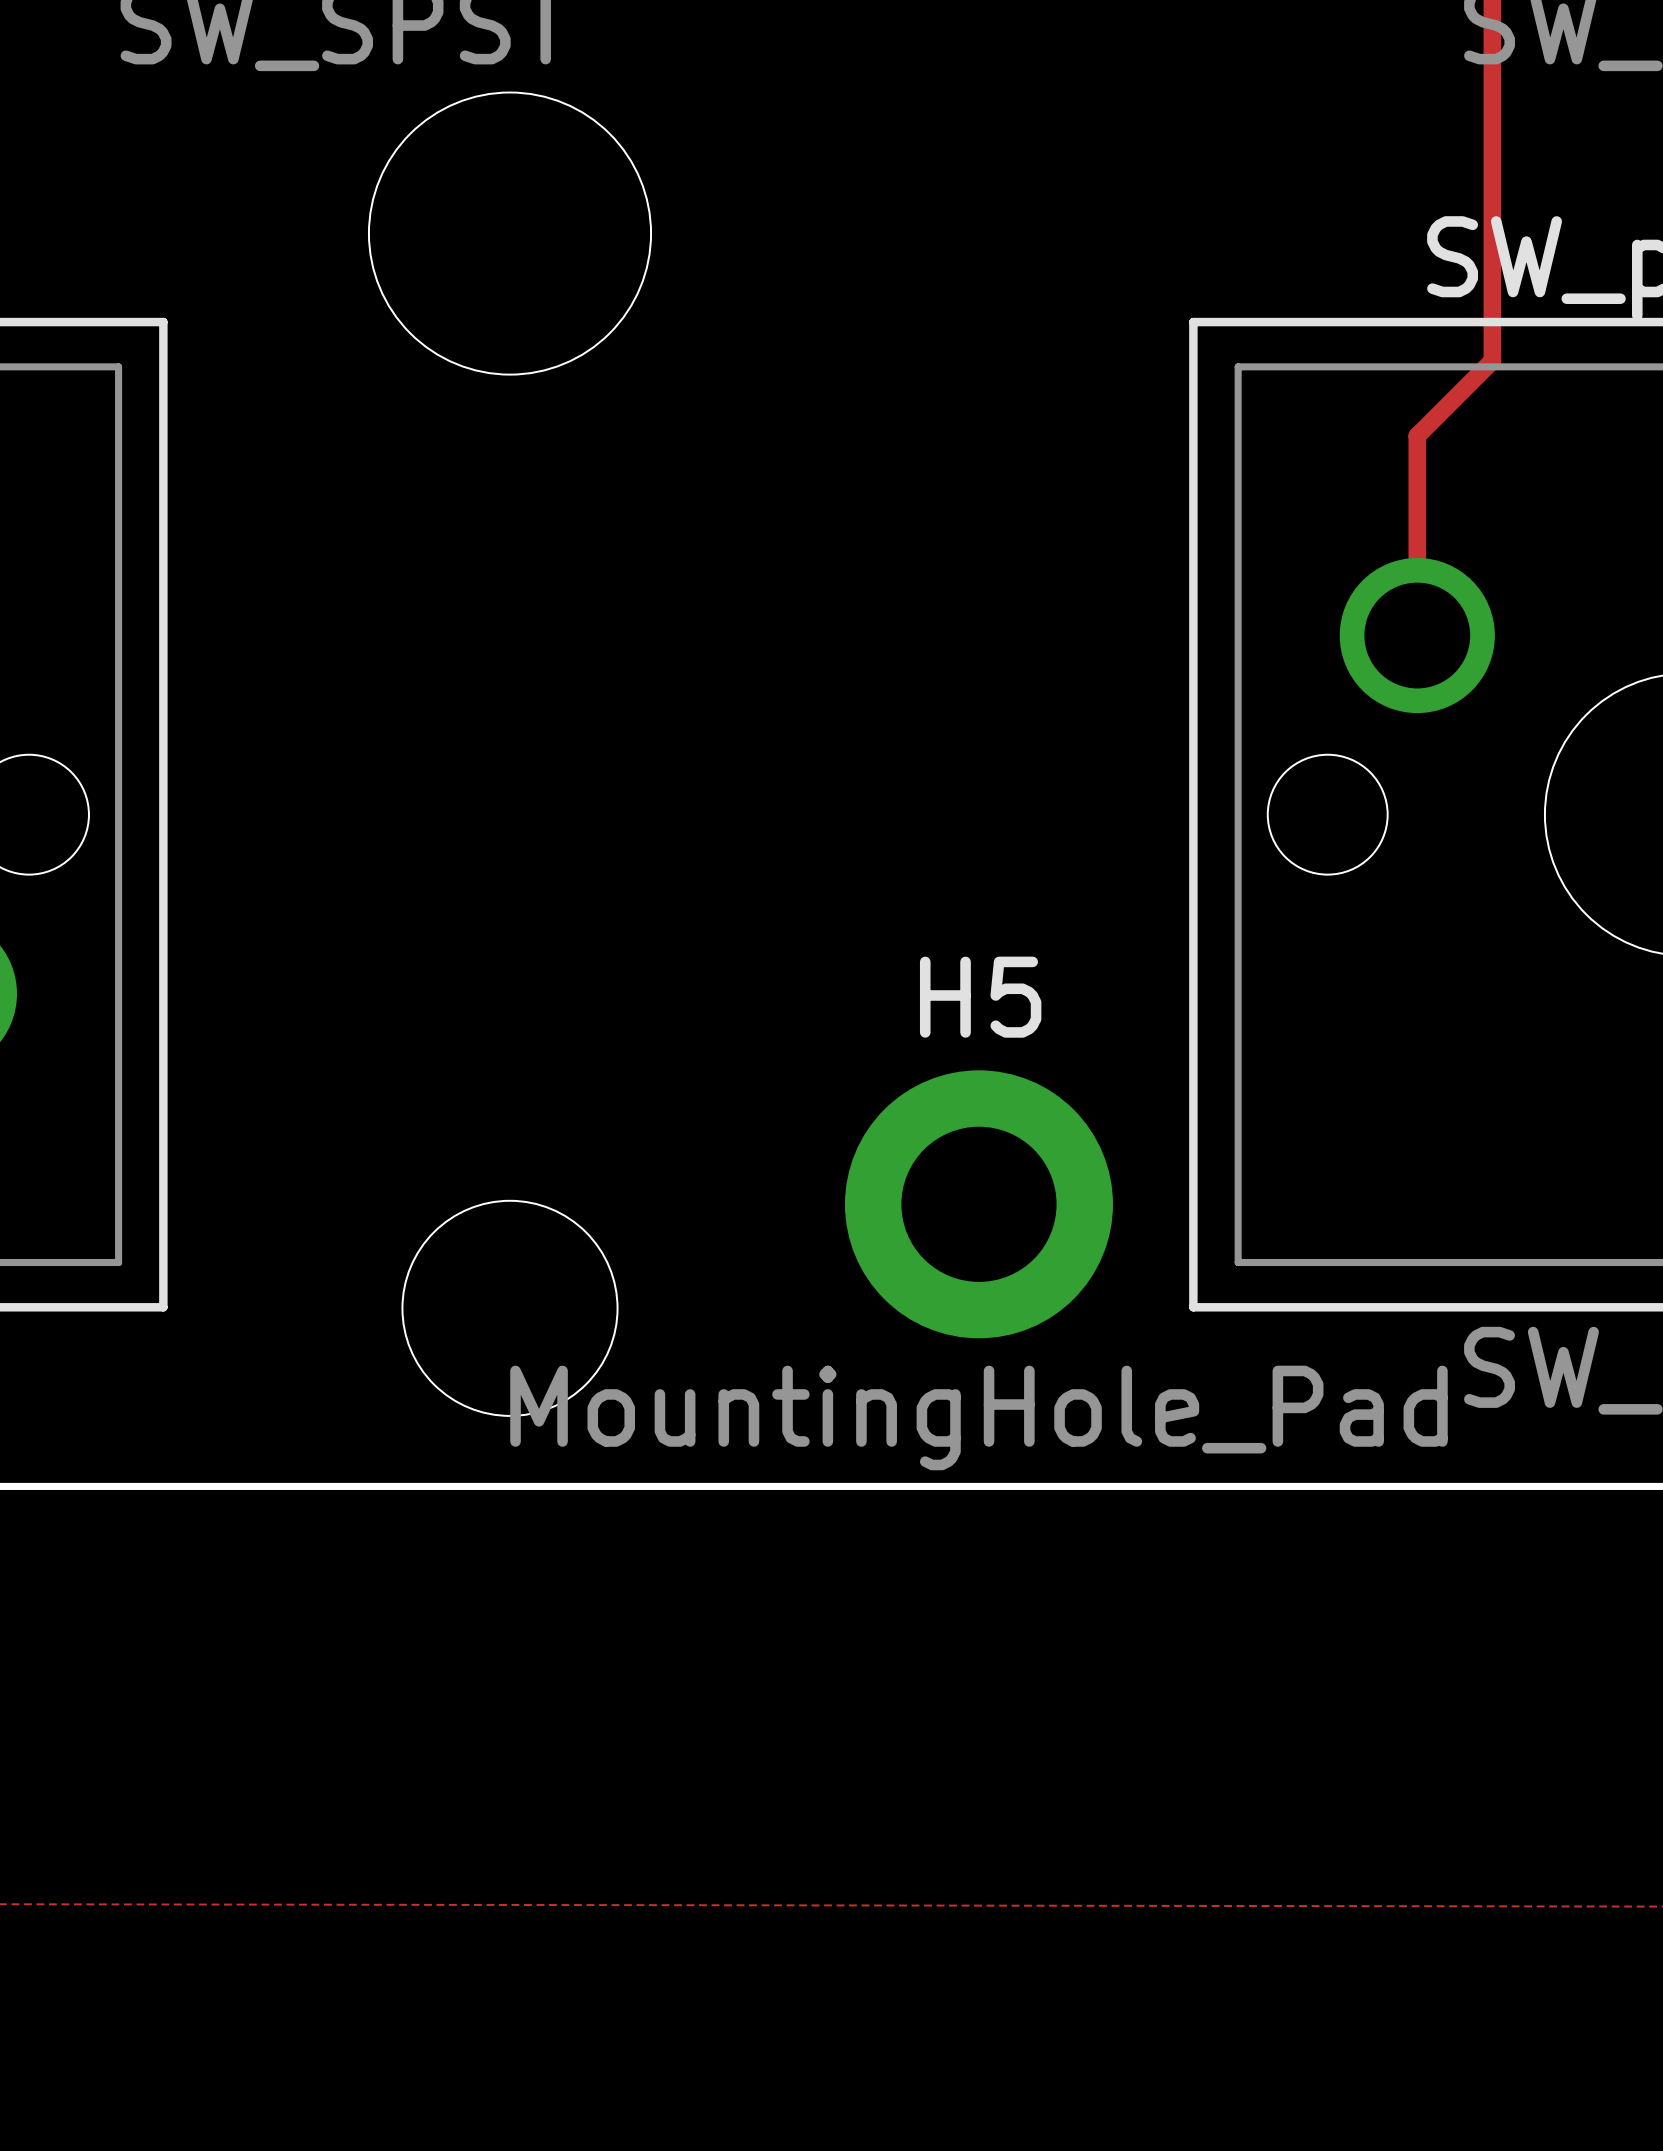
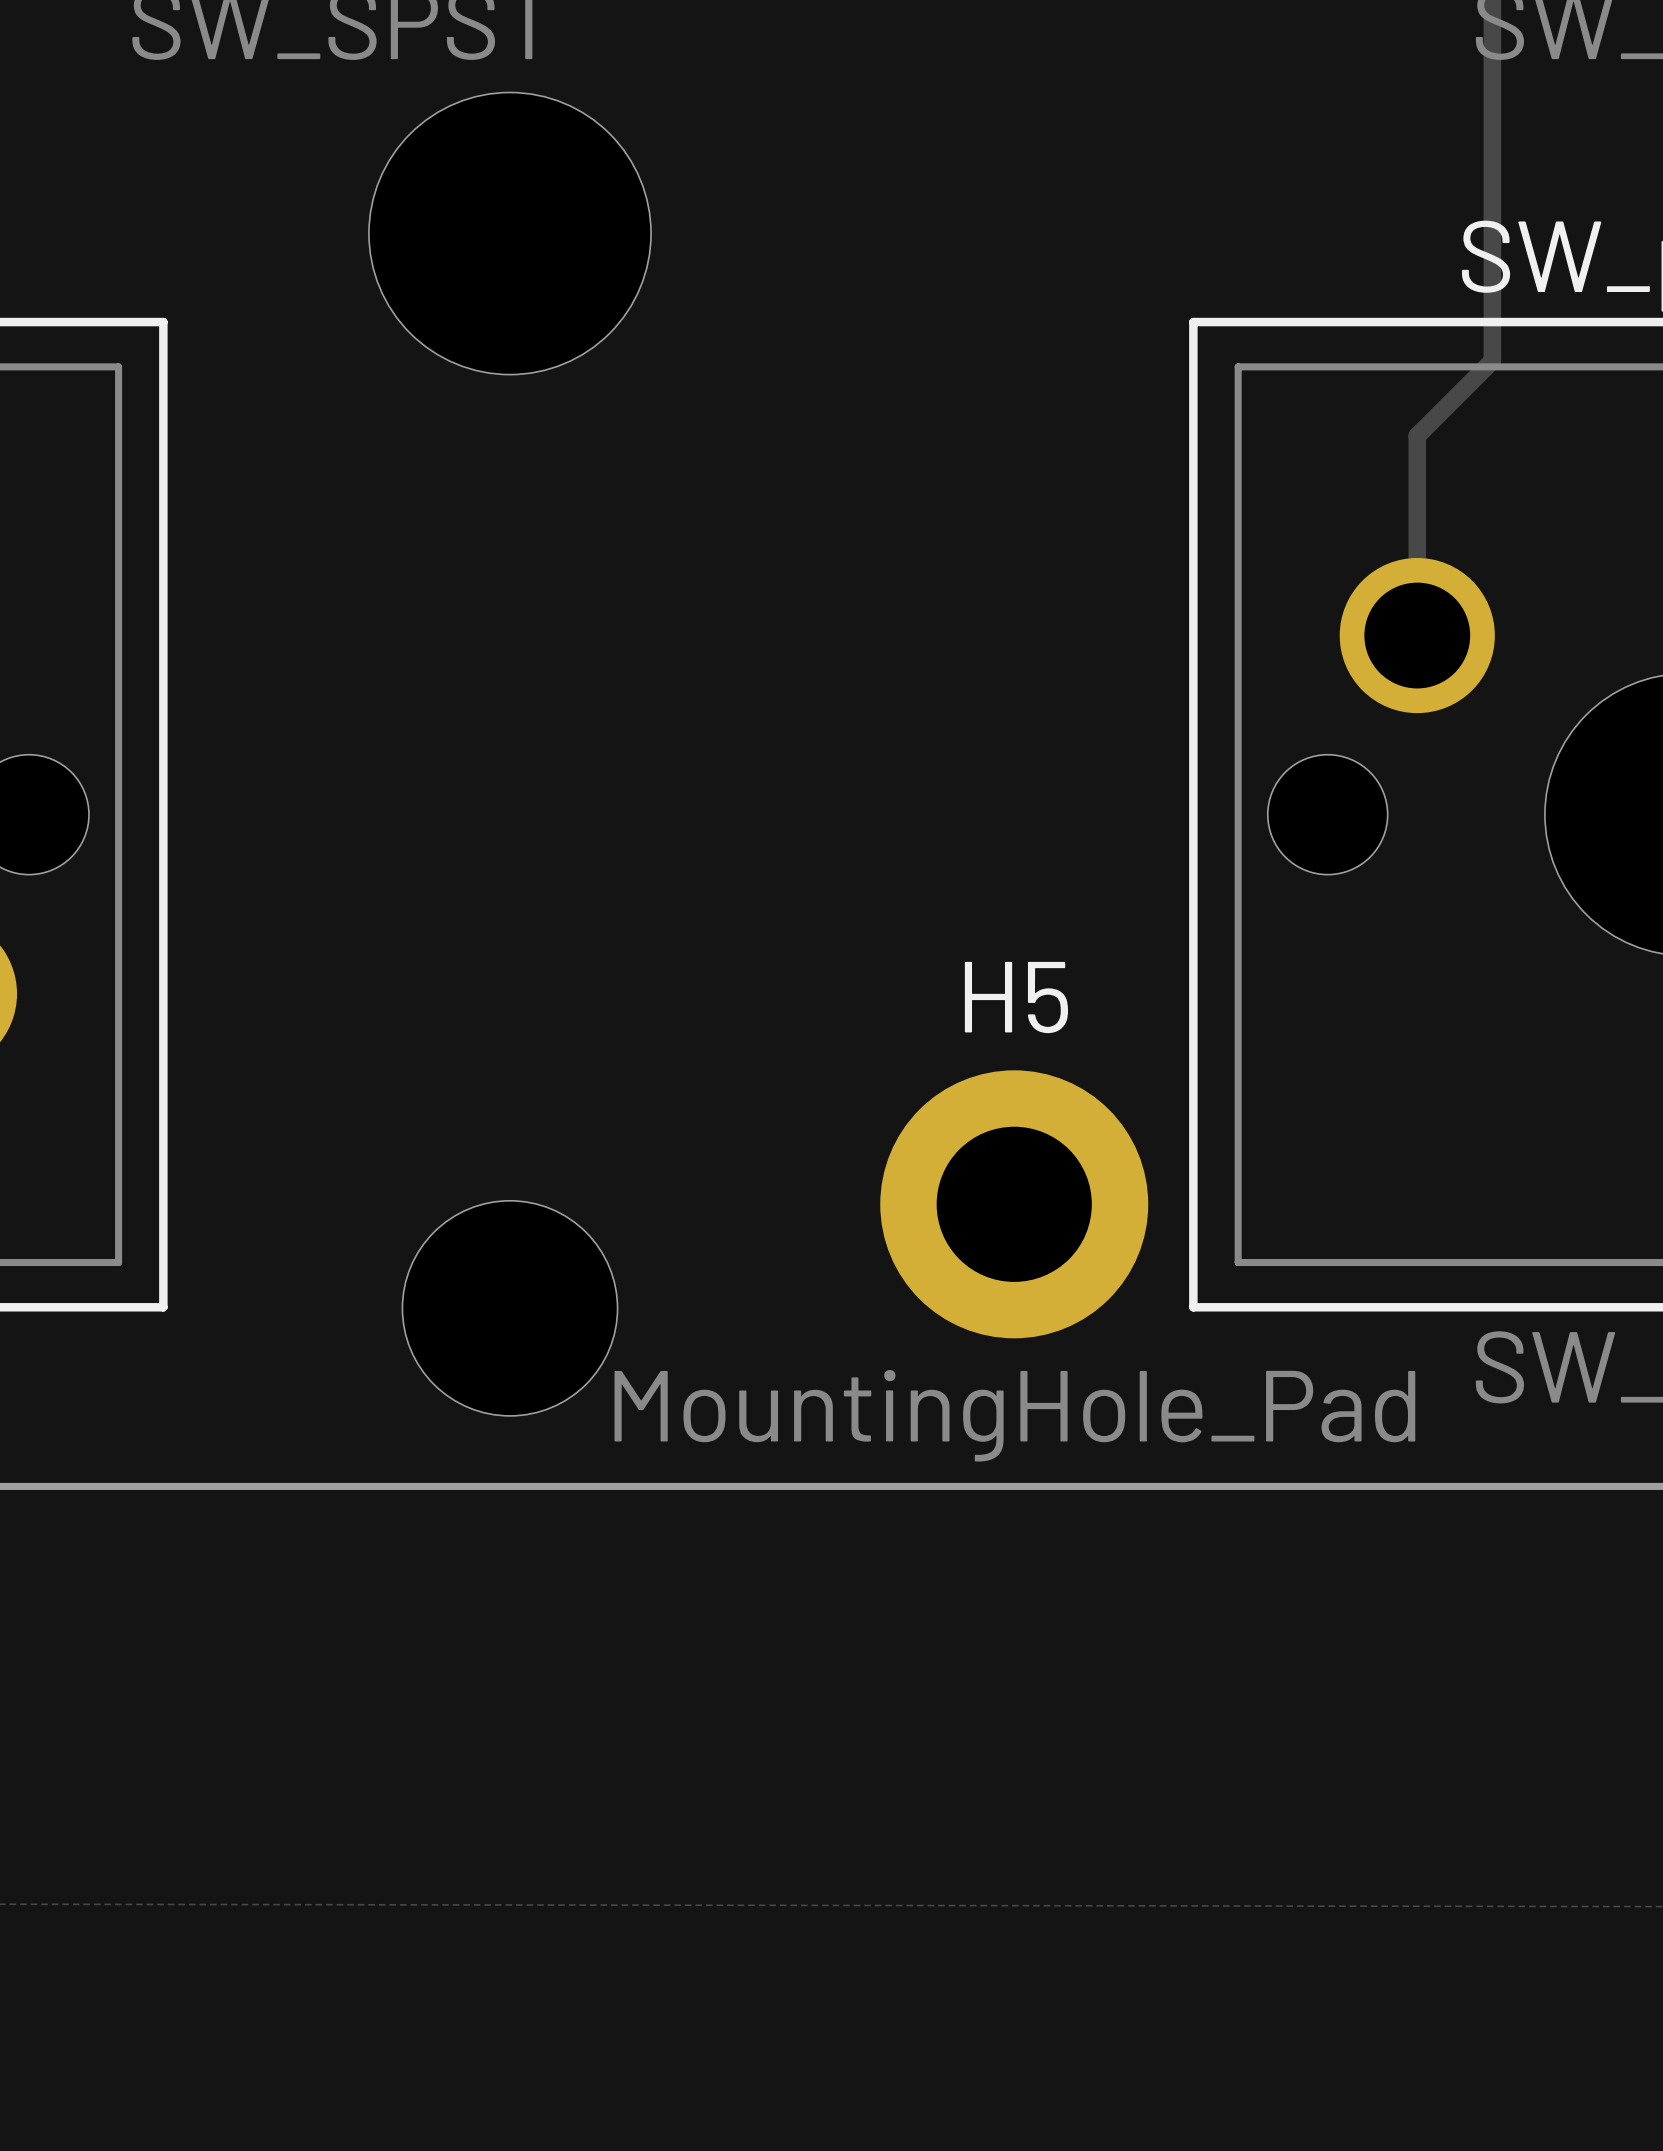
H5 position: (978, 1204) -> (1014, 1204)

